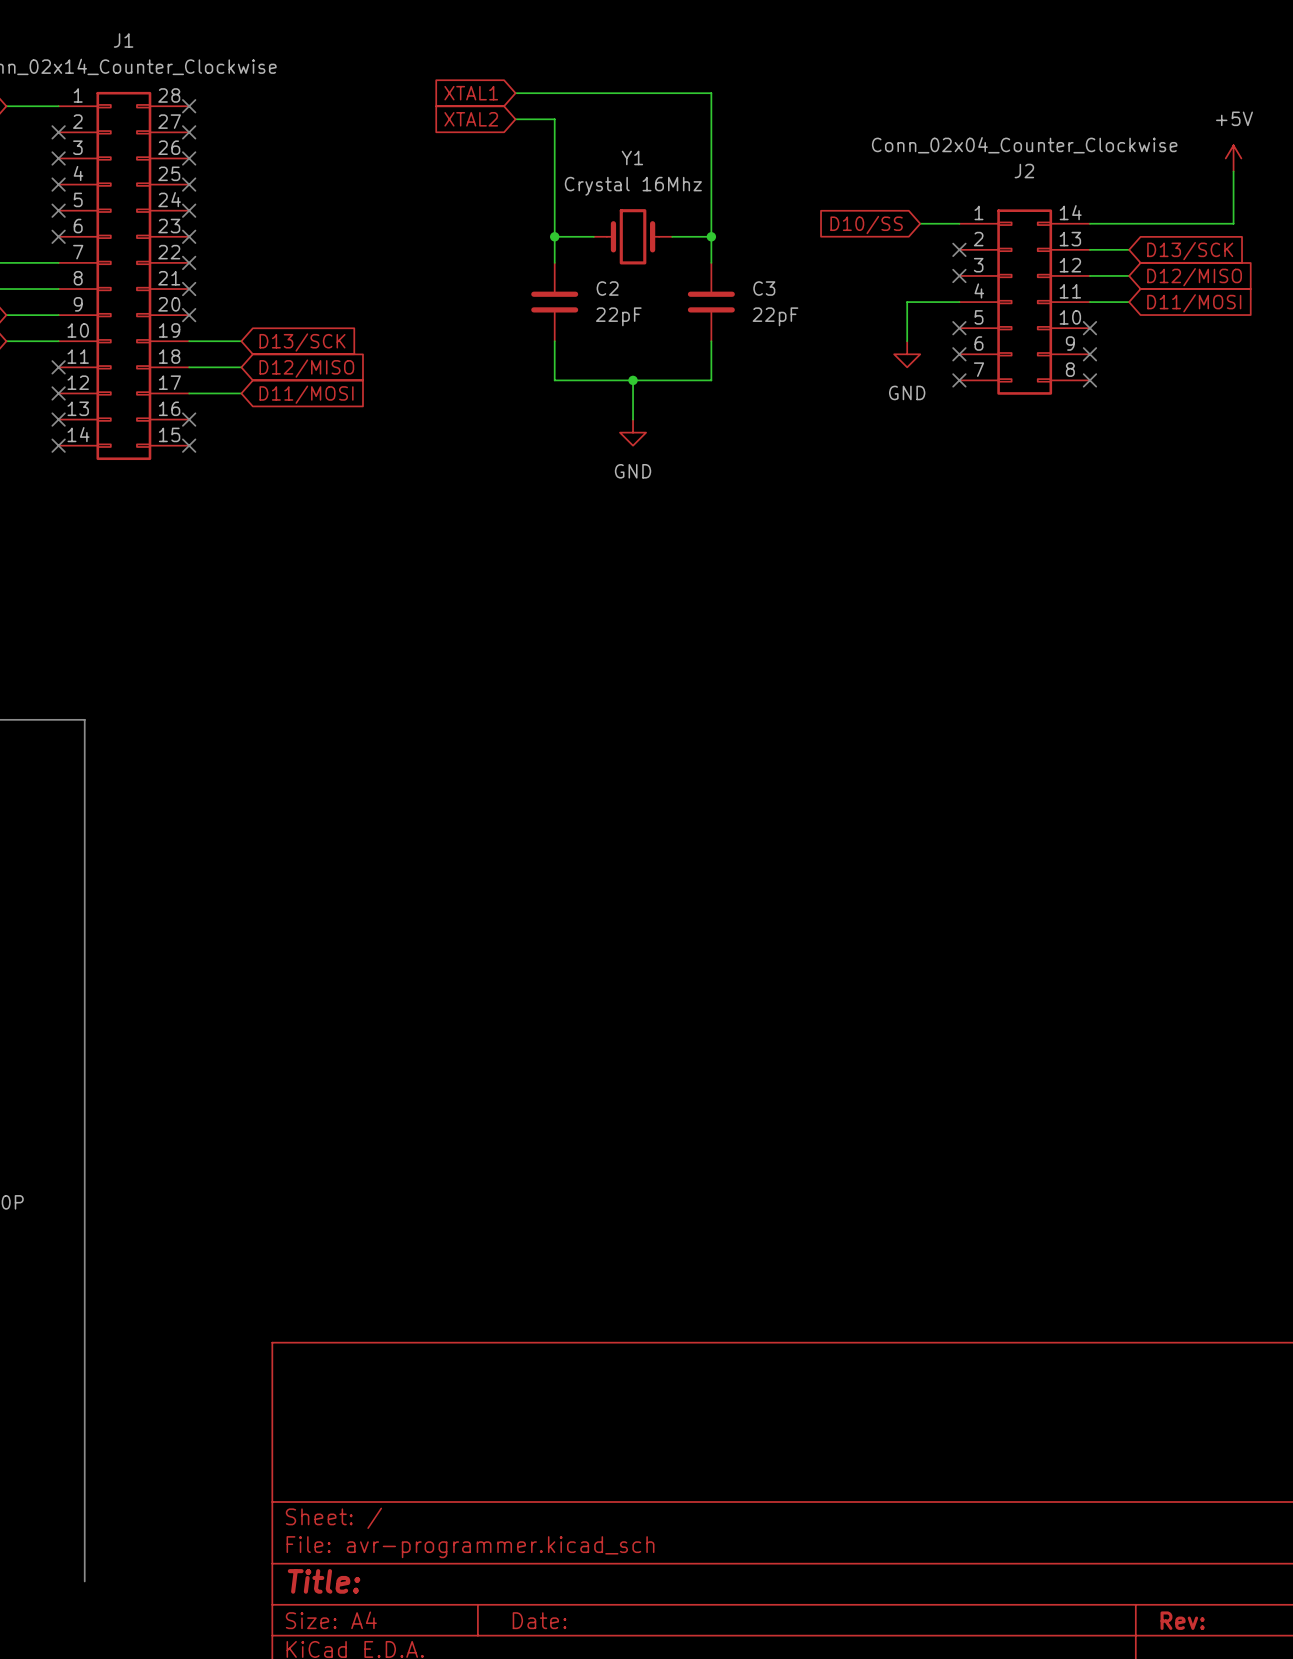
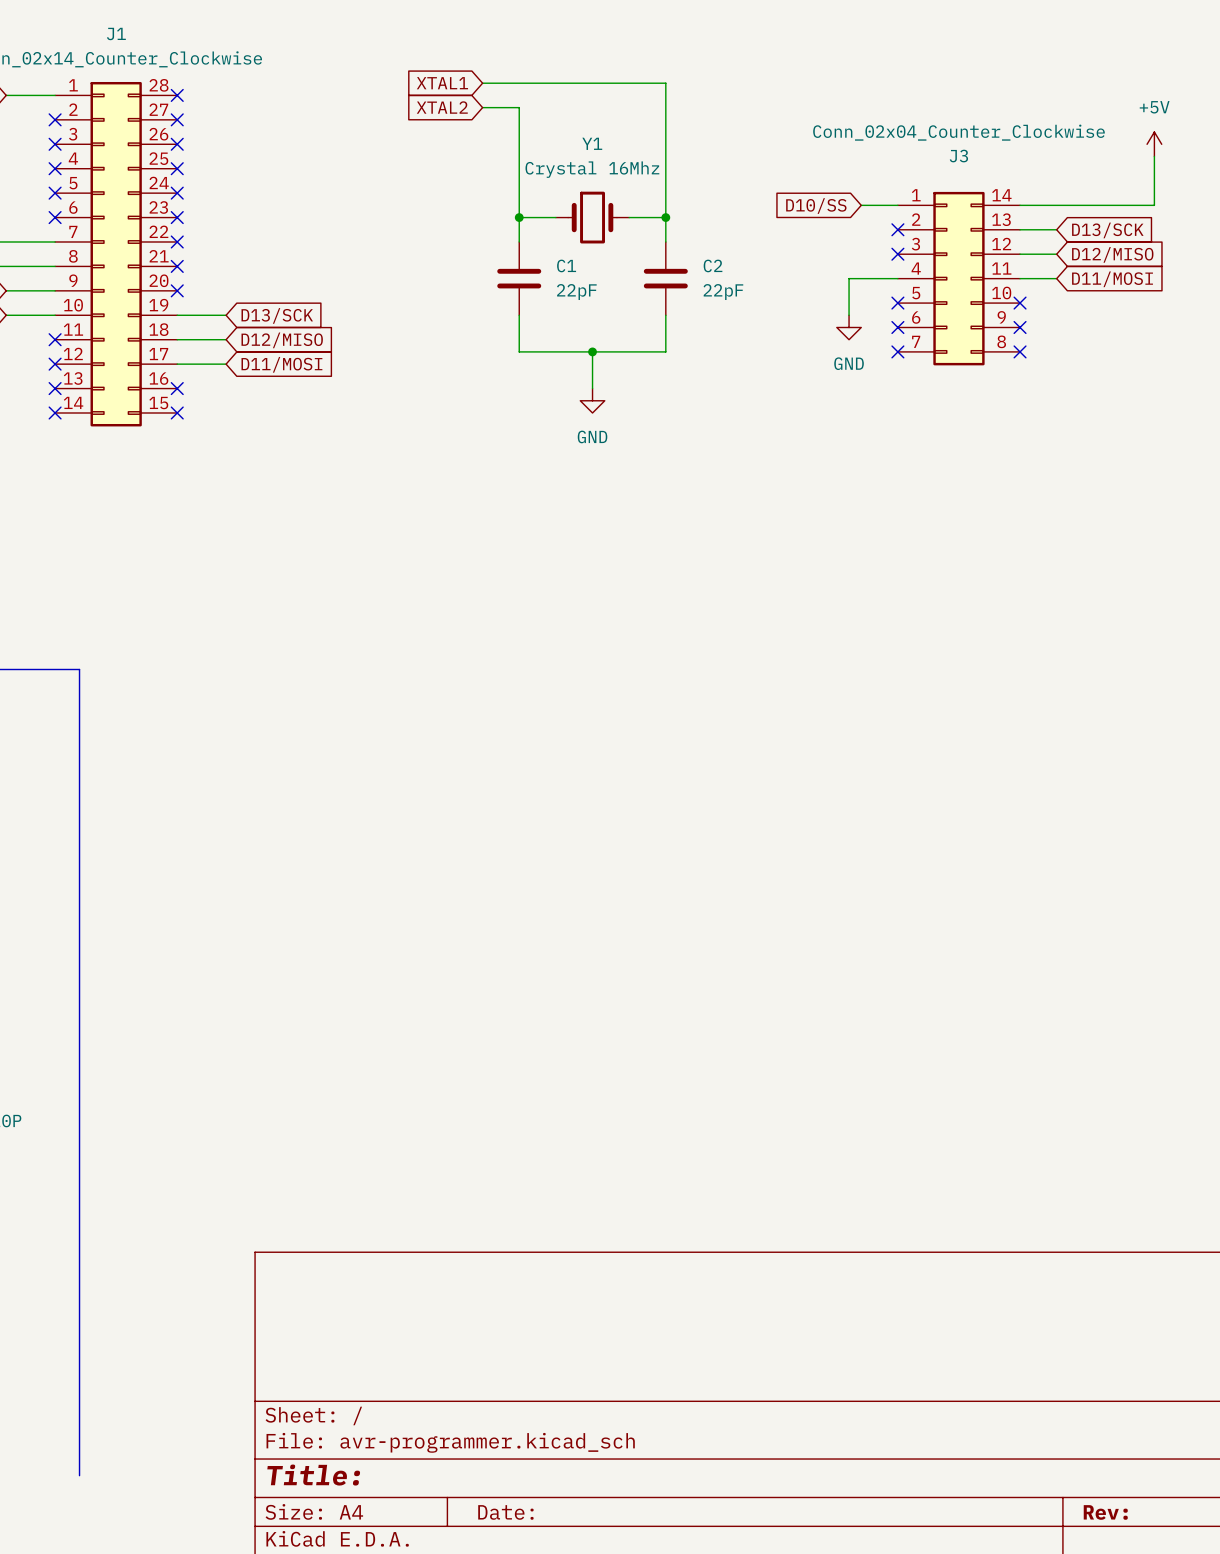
J2 name: J2 (1024, 171) -> J3 (958, 156)
C2 name: C2 (607, 288) -> C1 (566, 265)
C3 name: C3 (764, 288) -> C2 (713, 265)

